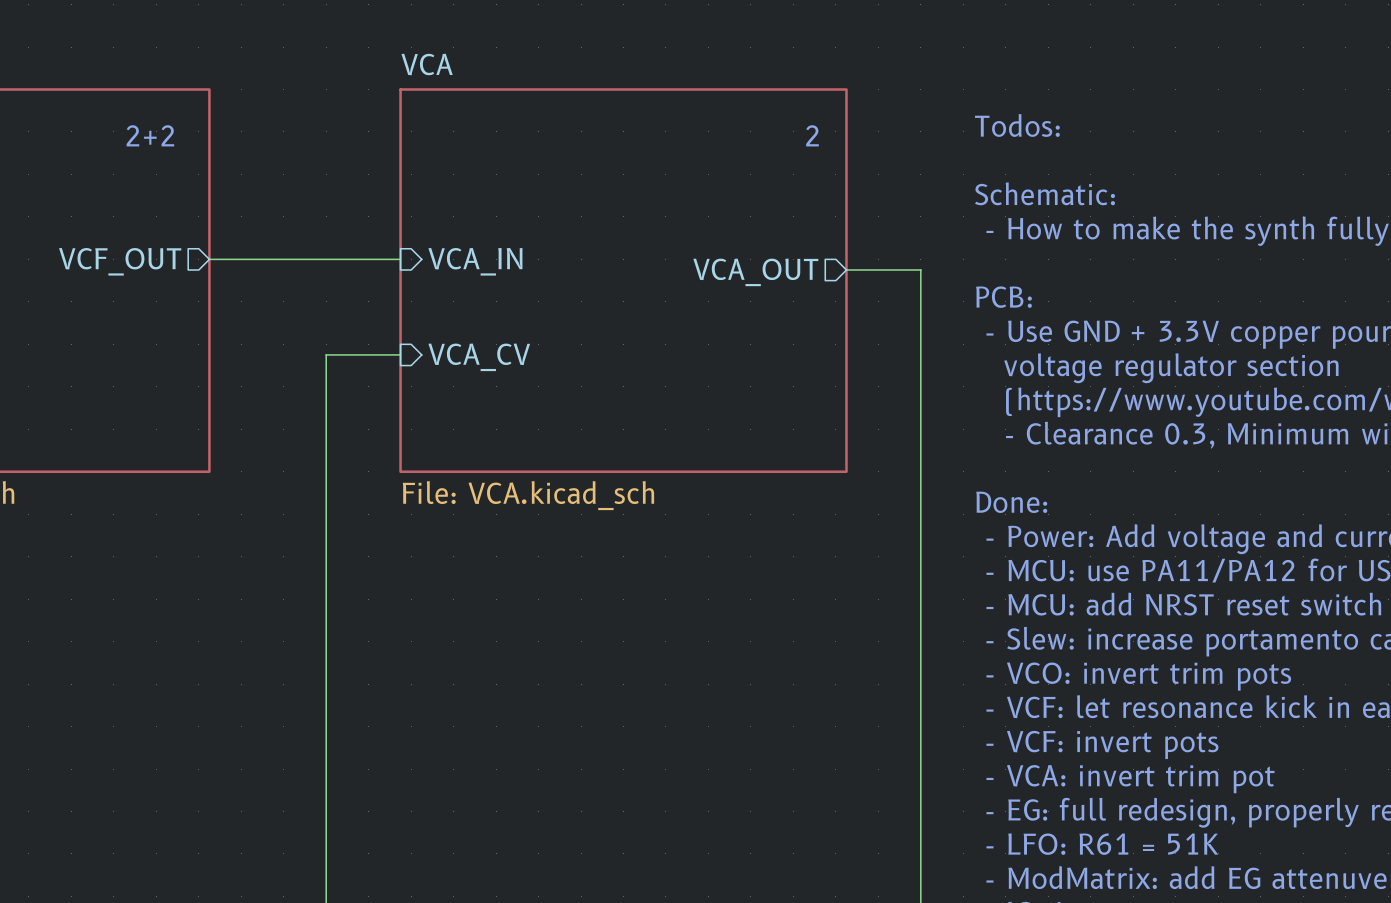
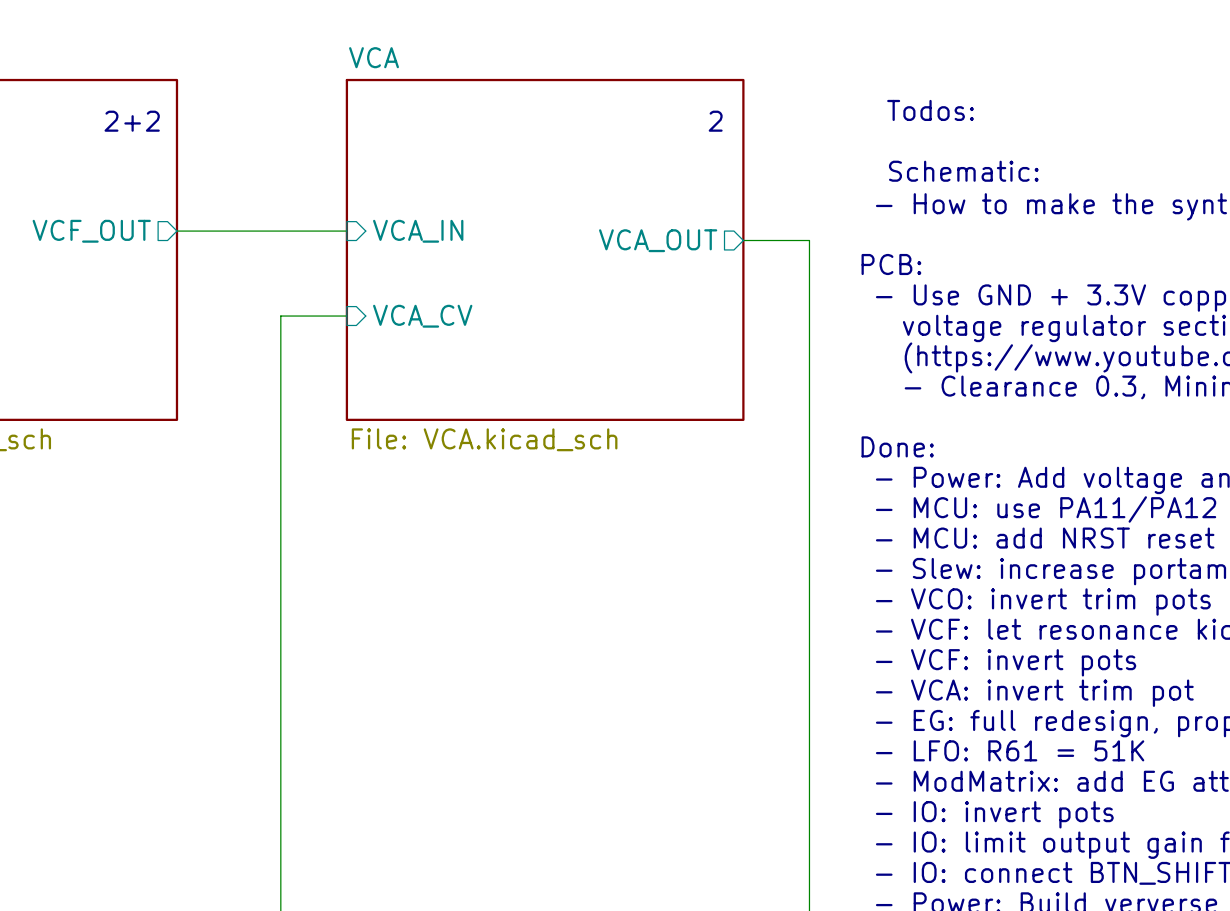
text position: Todos: (1017, 125) -> Todos: (930, 110)
text position: Schematic: (1045, 193) -> Schematic: (963, 171)

